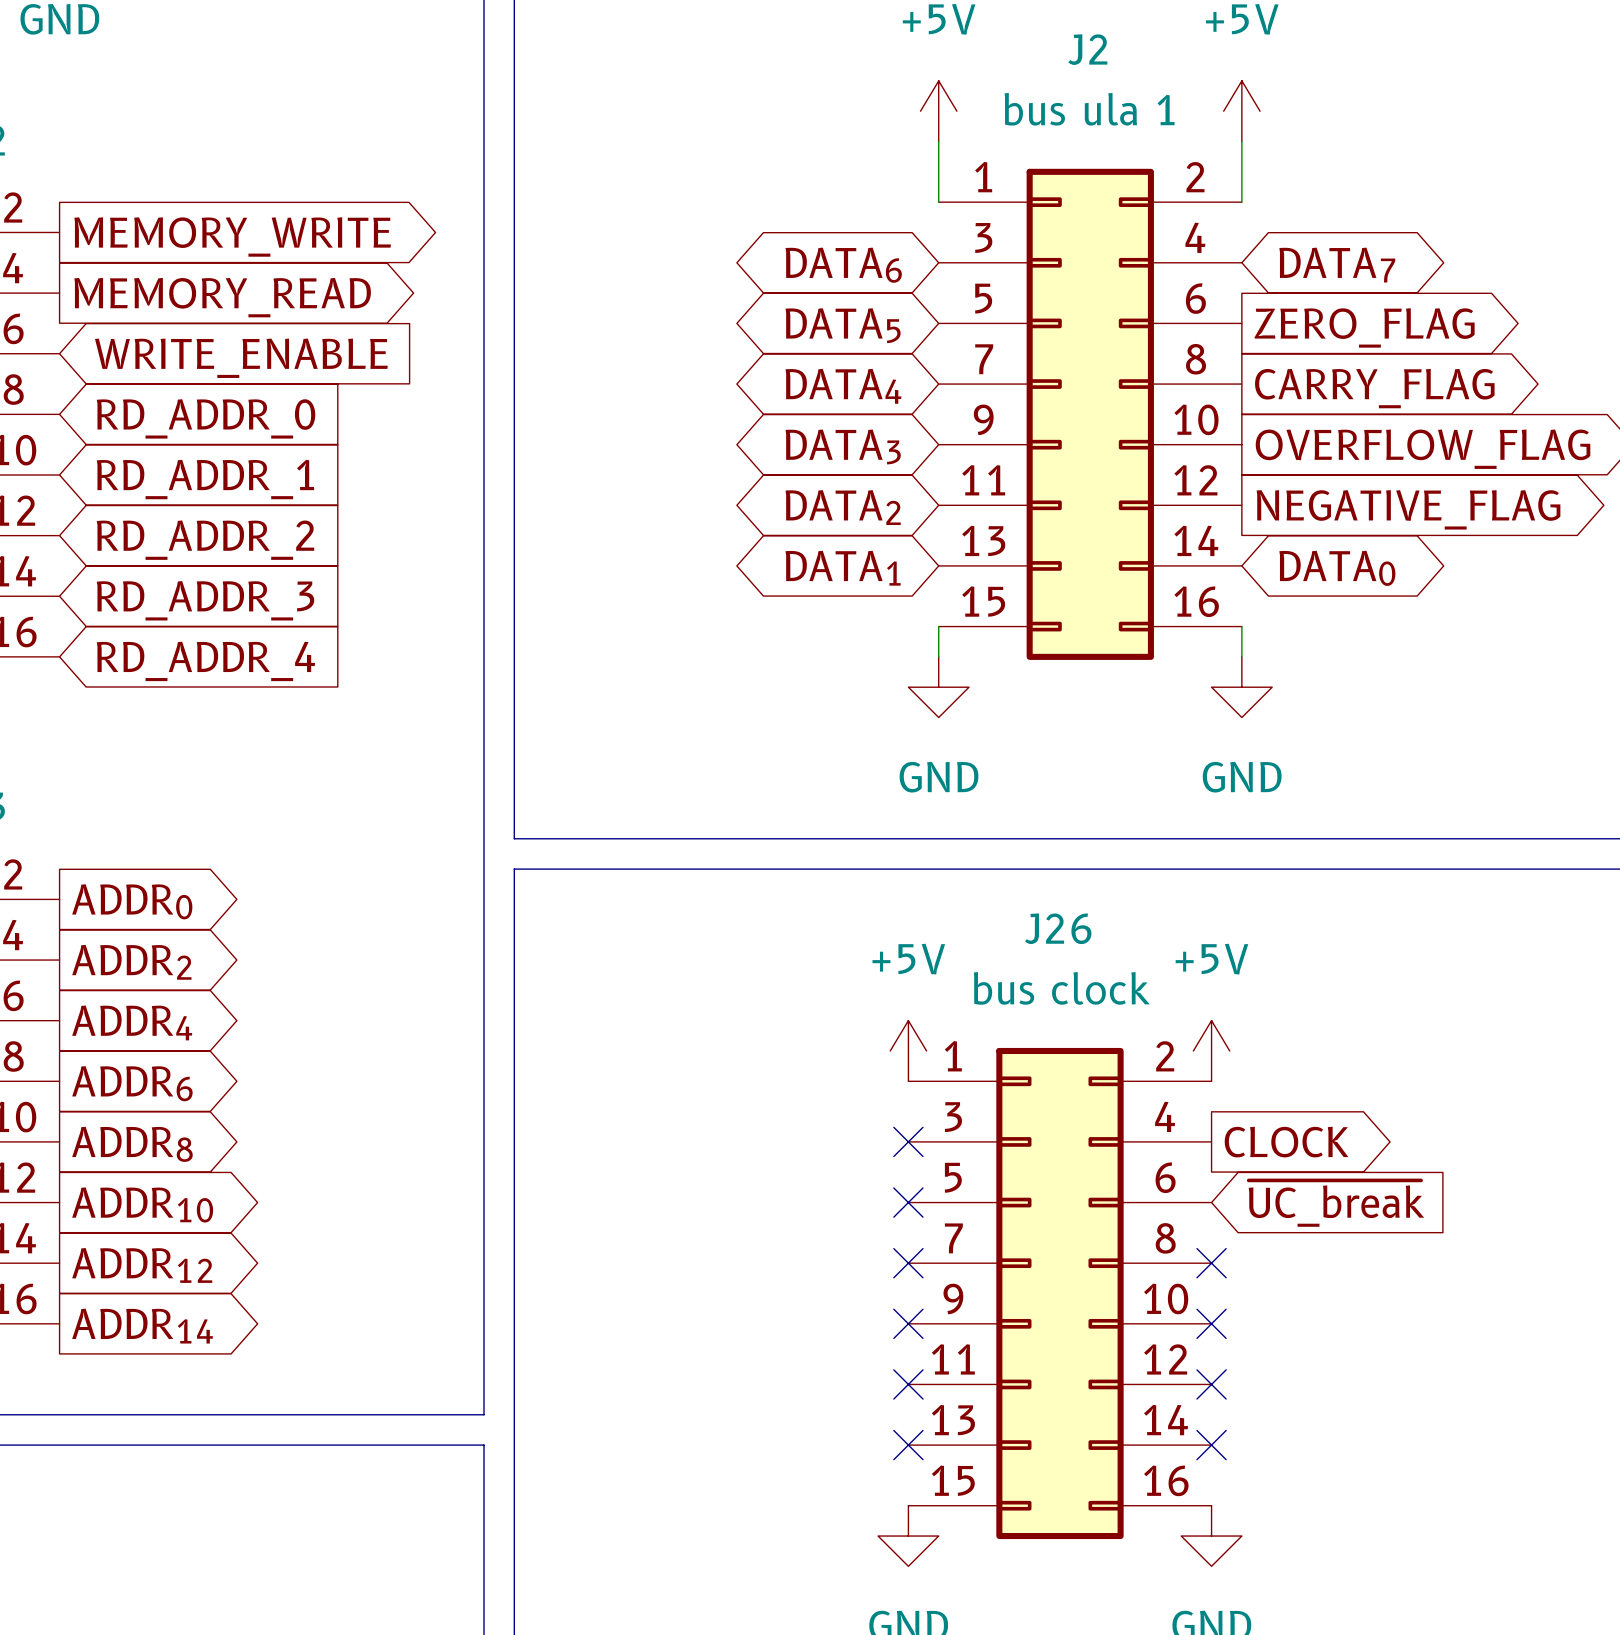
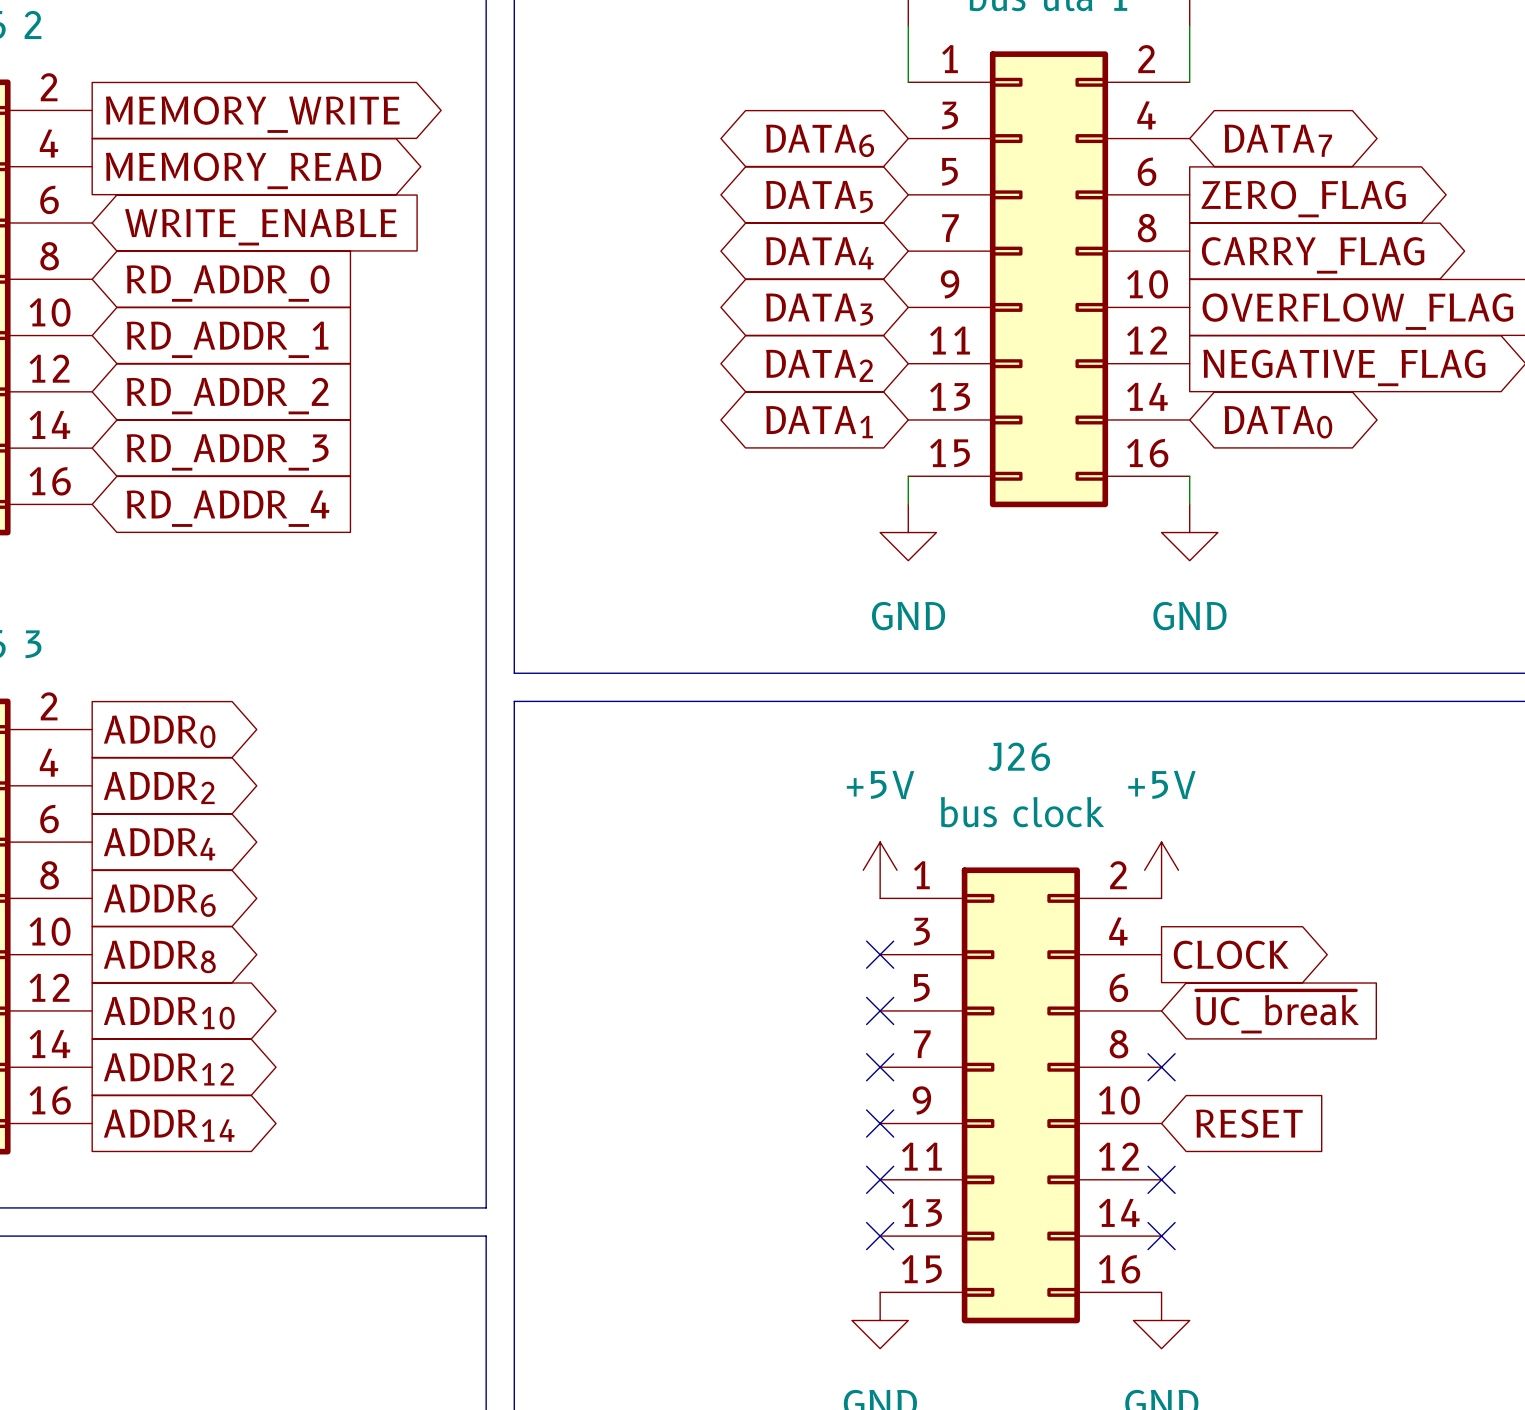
no-connect mark: (1211, 1323) -> none
global label: none -> RESET (1249, 1123)

